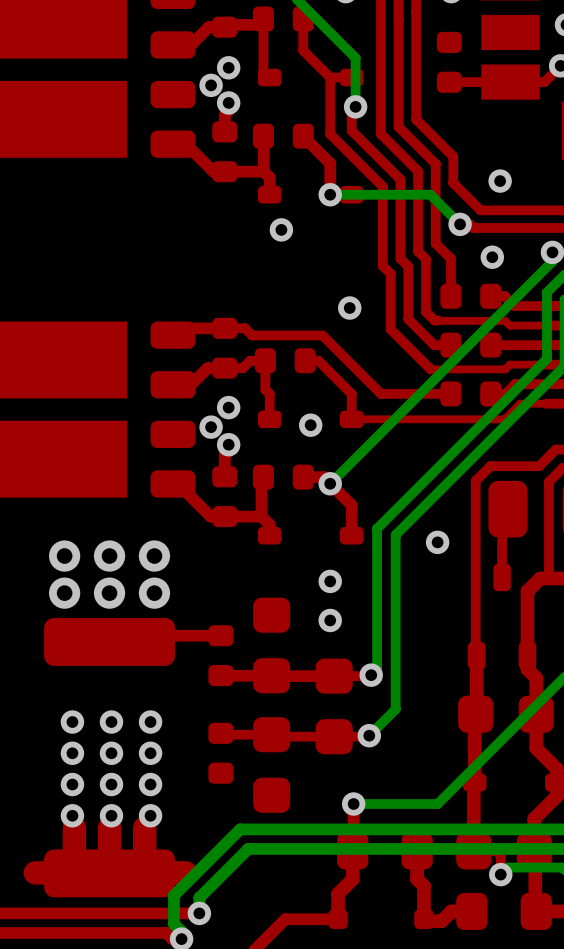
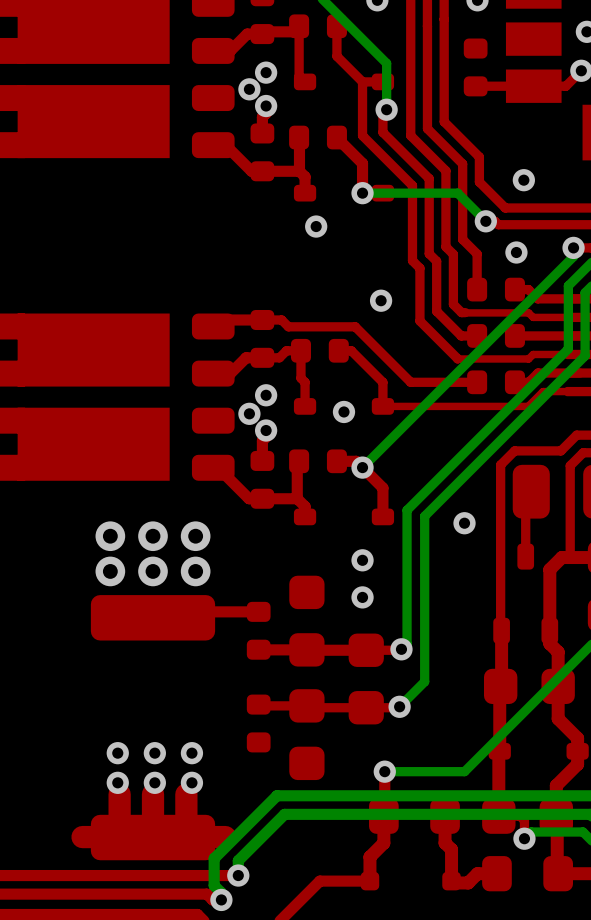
via: (72, 722) -> none
via: (111, 722) -> none
via: (150, 722) -> none
via: (72, 753) -> none
via: (111, 753) -> none
via: (150, 753) -> none

